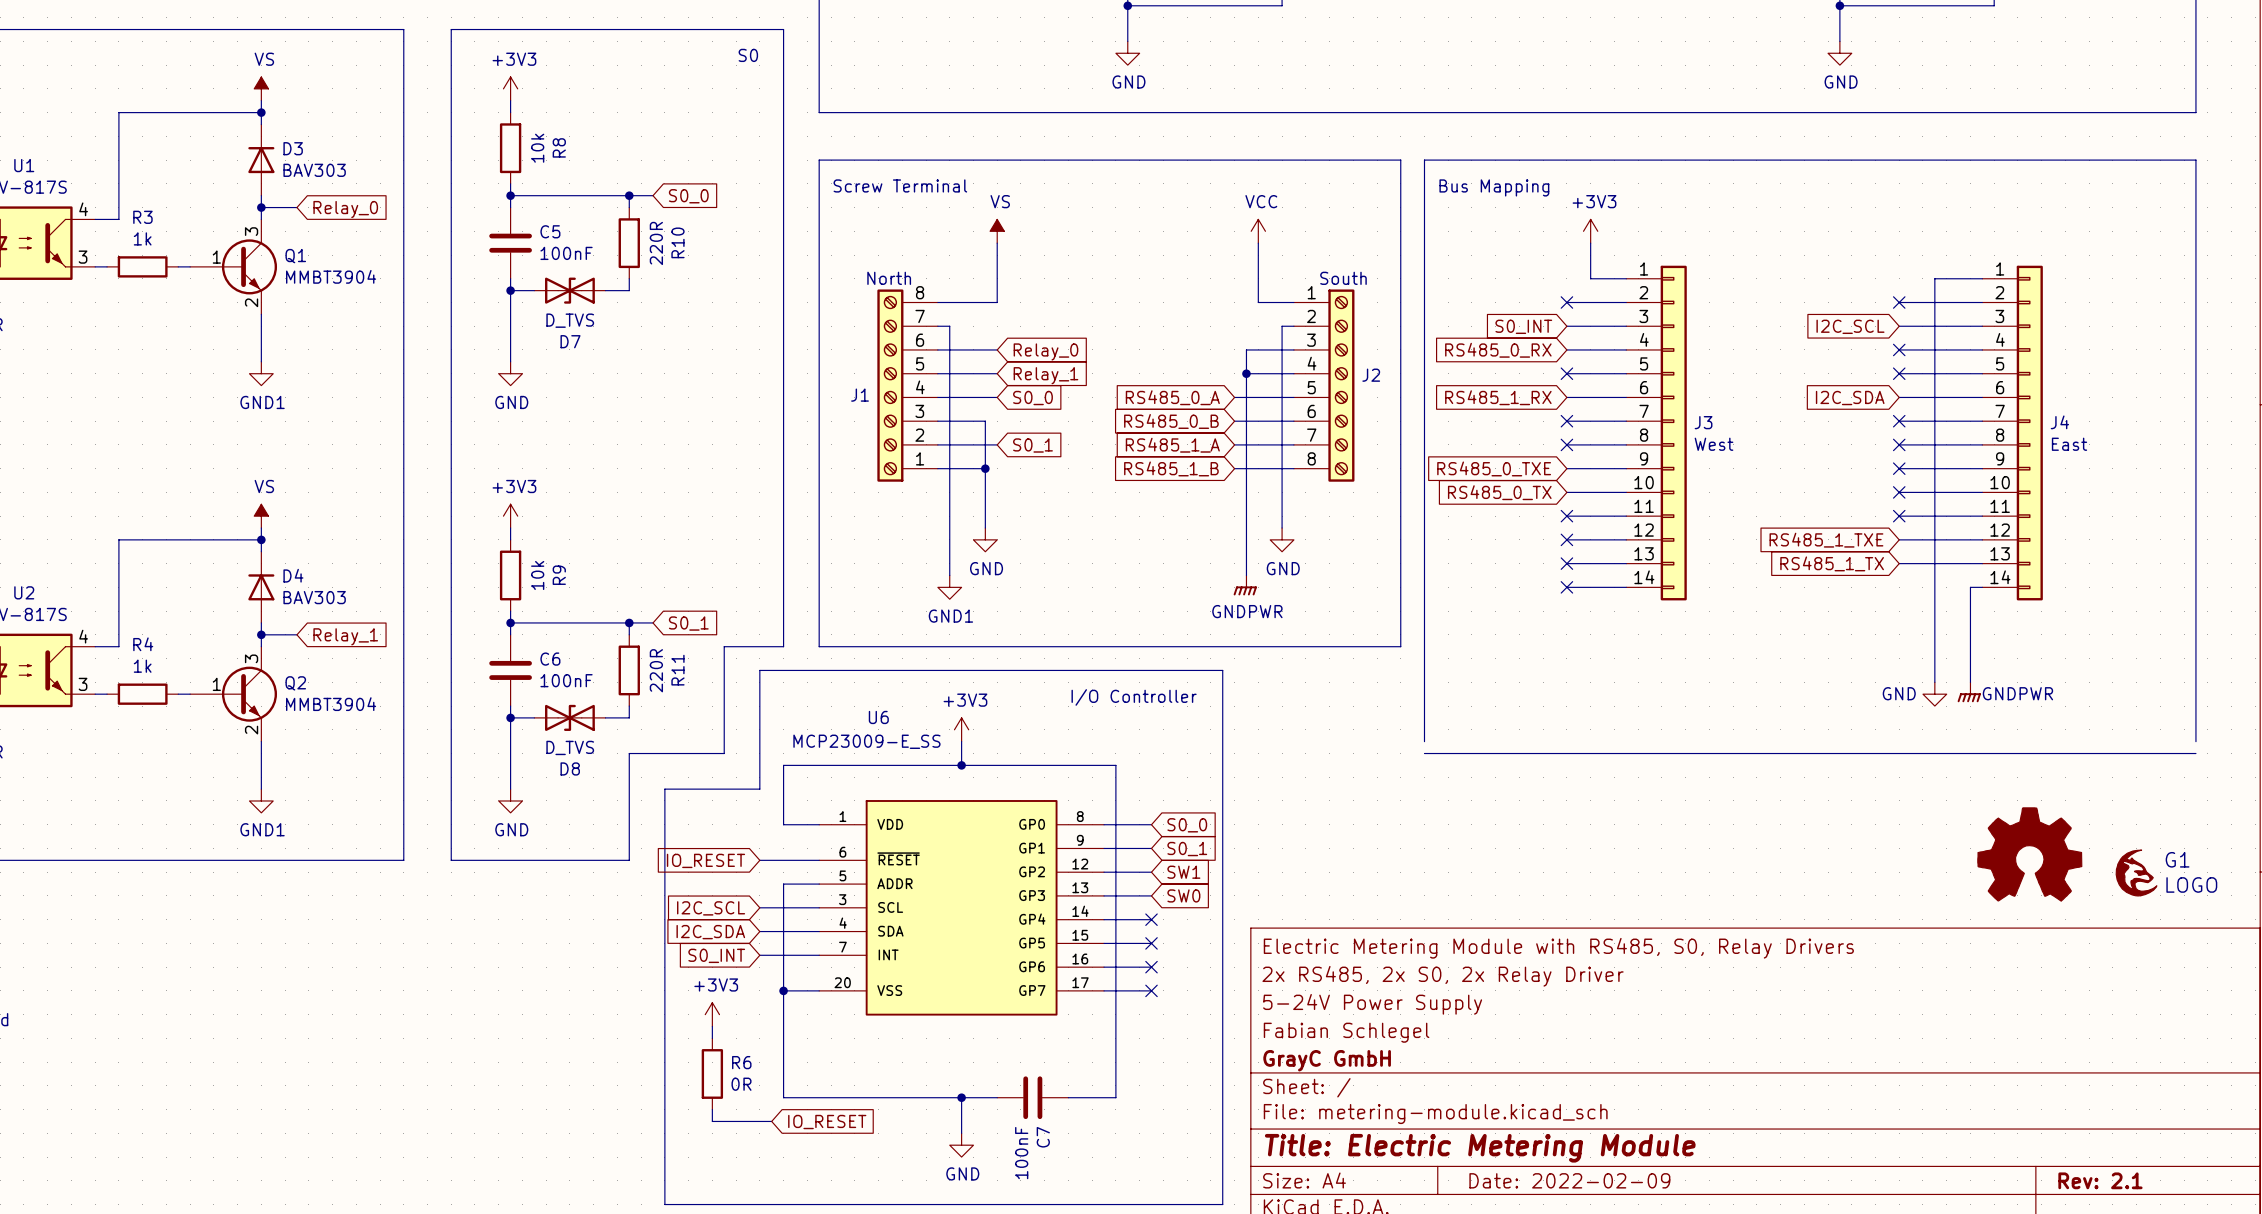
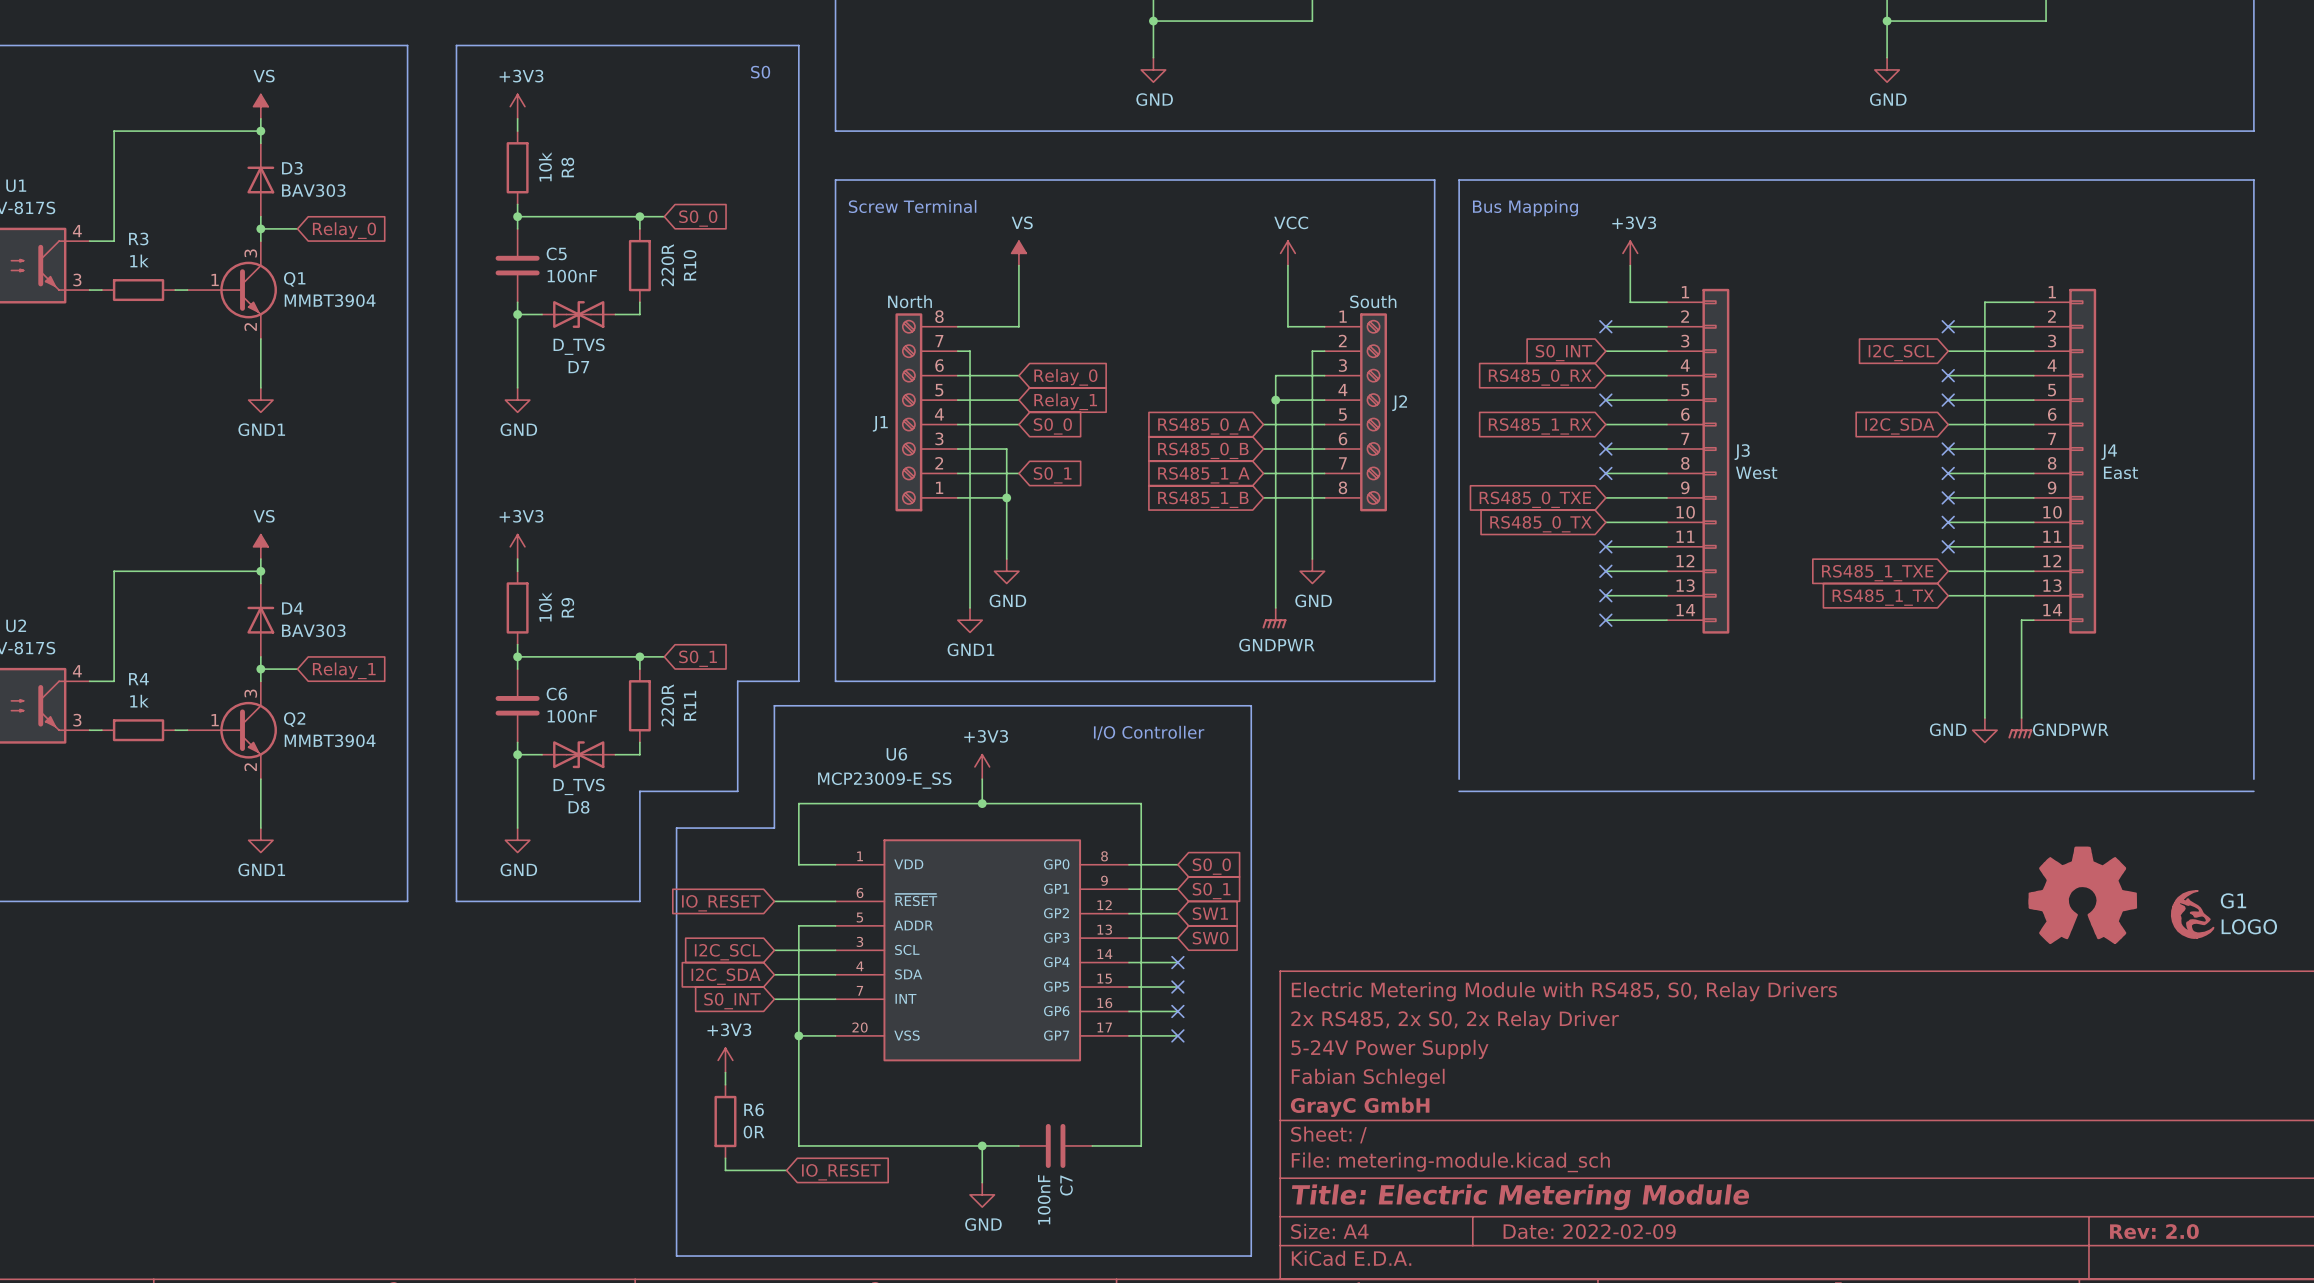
title block: Rev: 2.1 (2100, 1180) -> Rev: 2.0 (2154, 1231)

